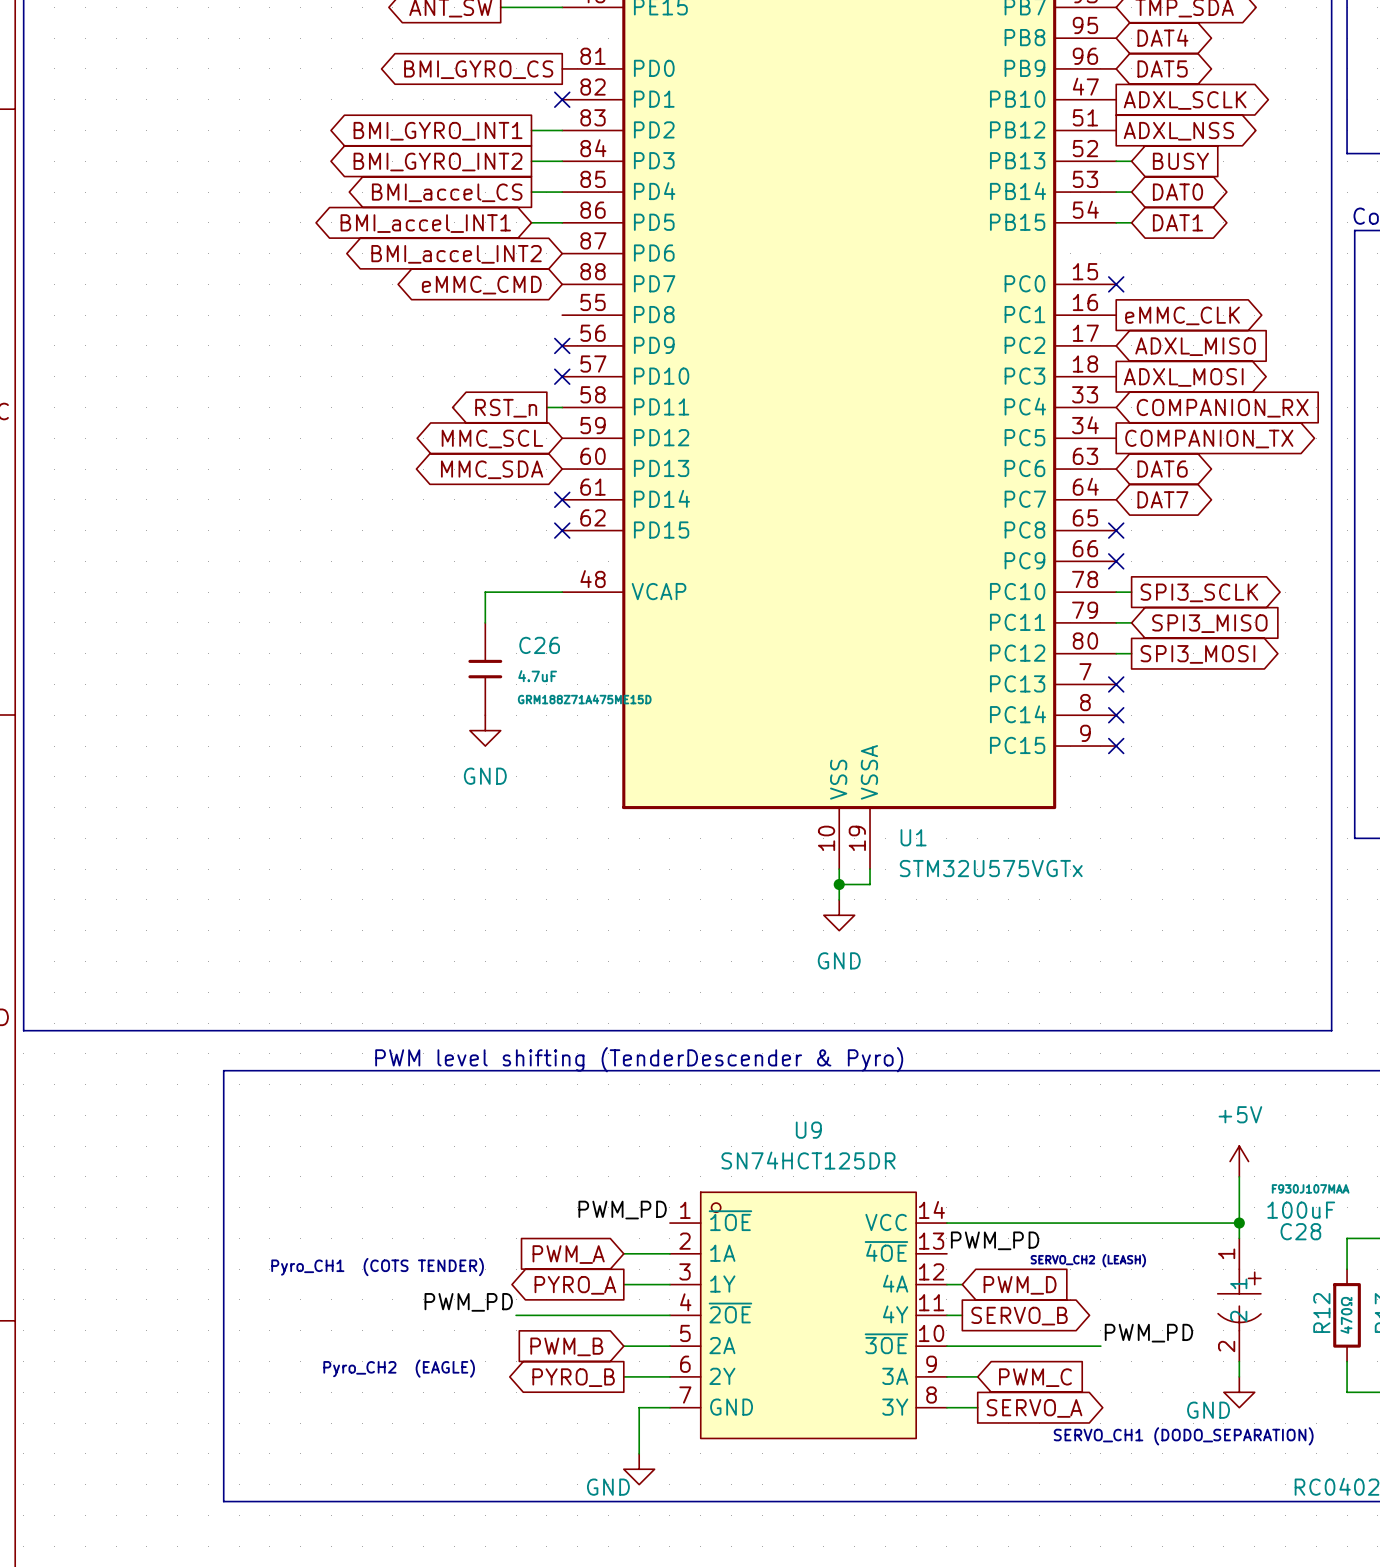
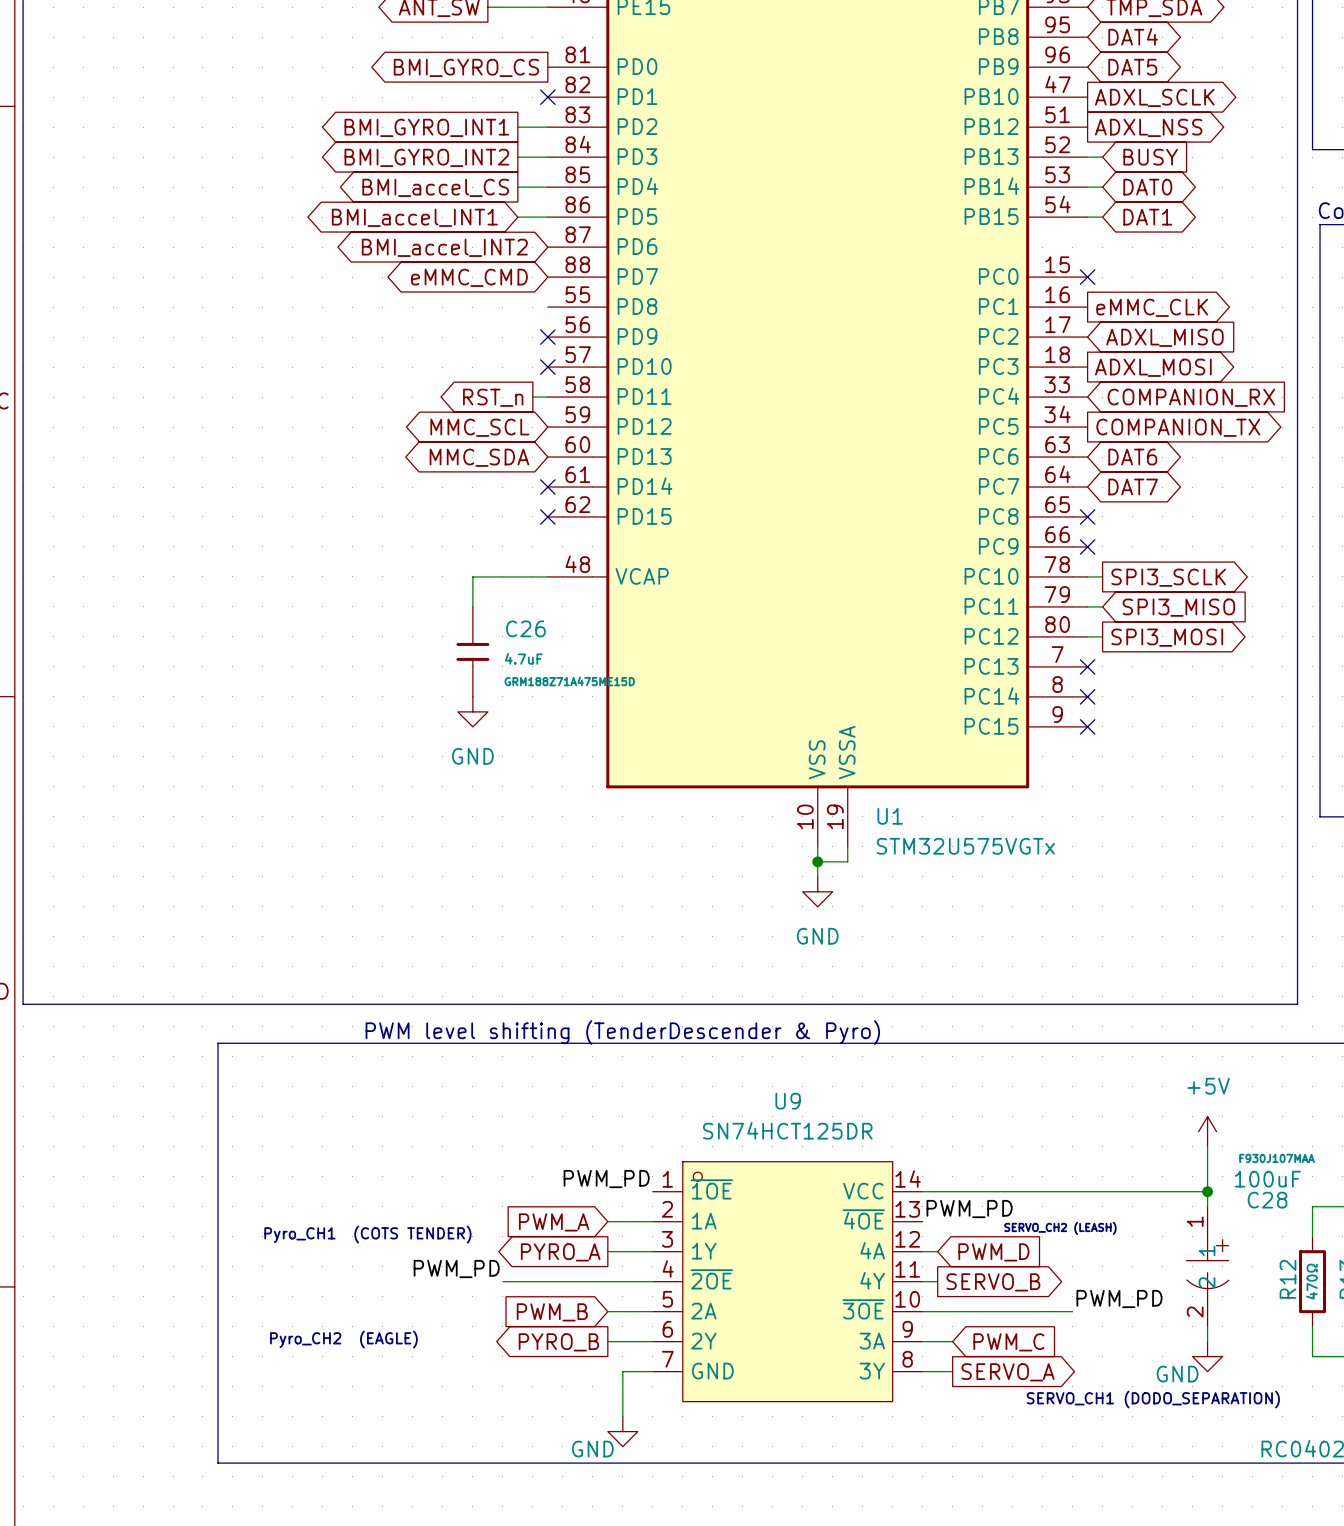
text position: Pyro_CH2 (EAGLE) (399, 1368) -> Pyro_CH2 (EAGLE) (343, 1339)

